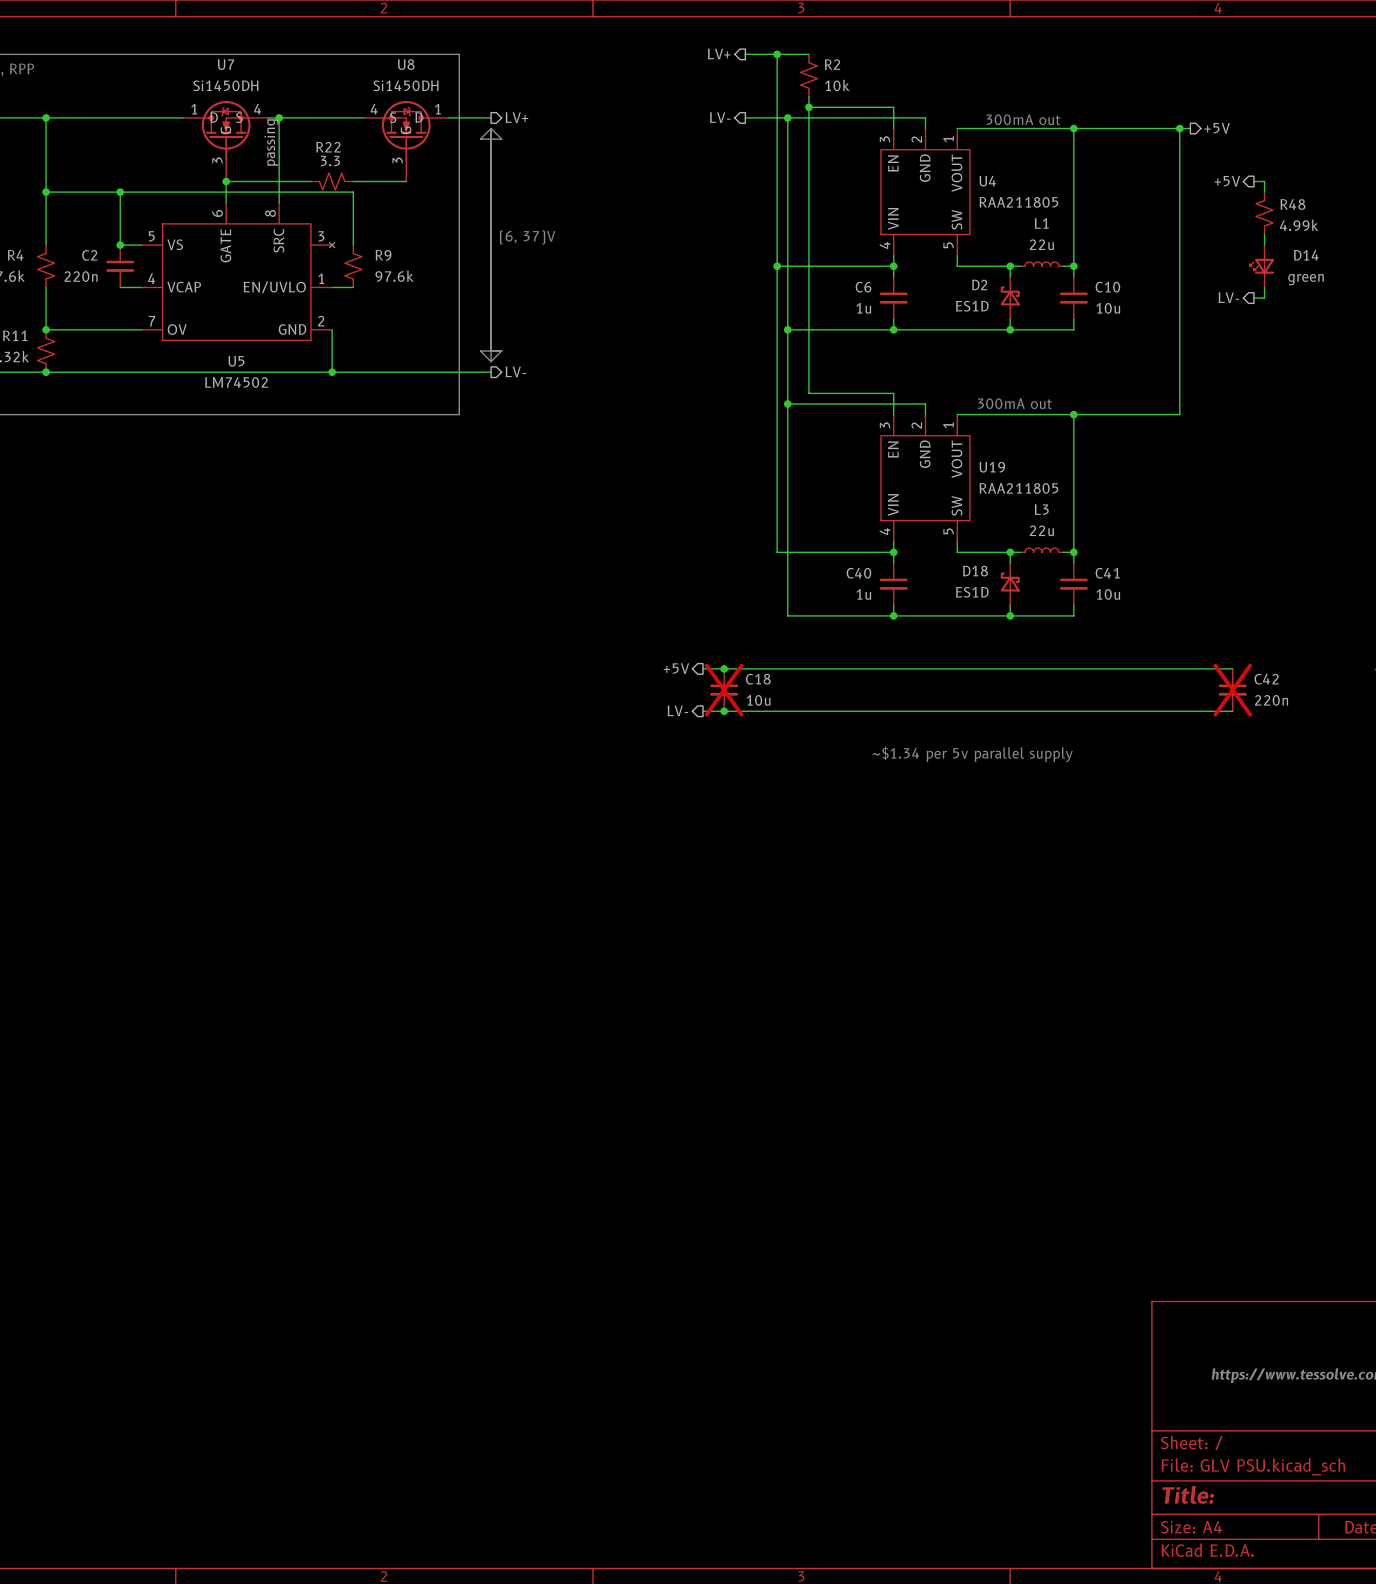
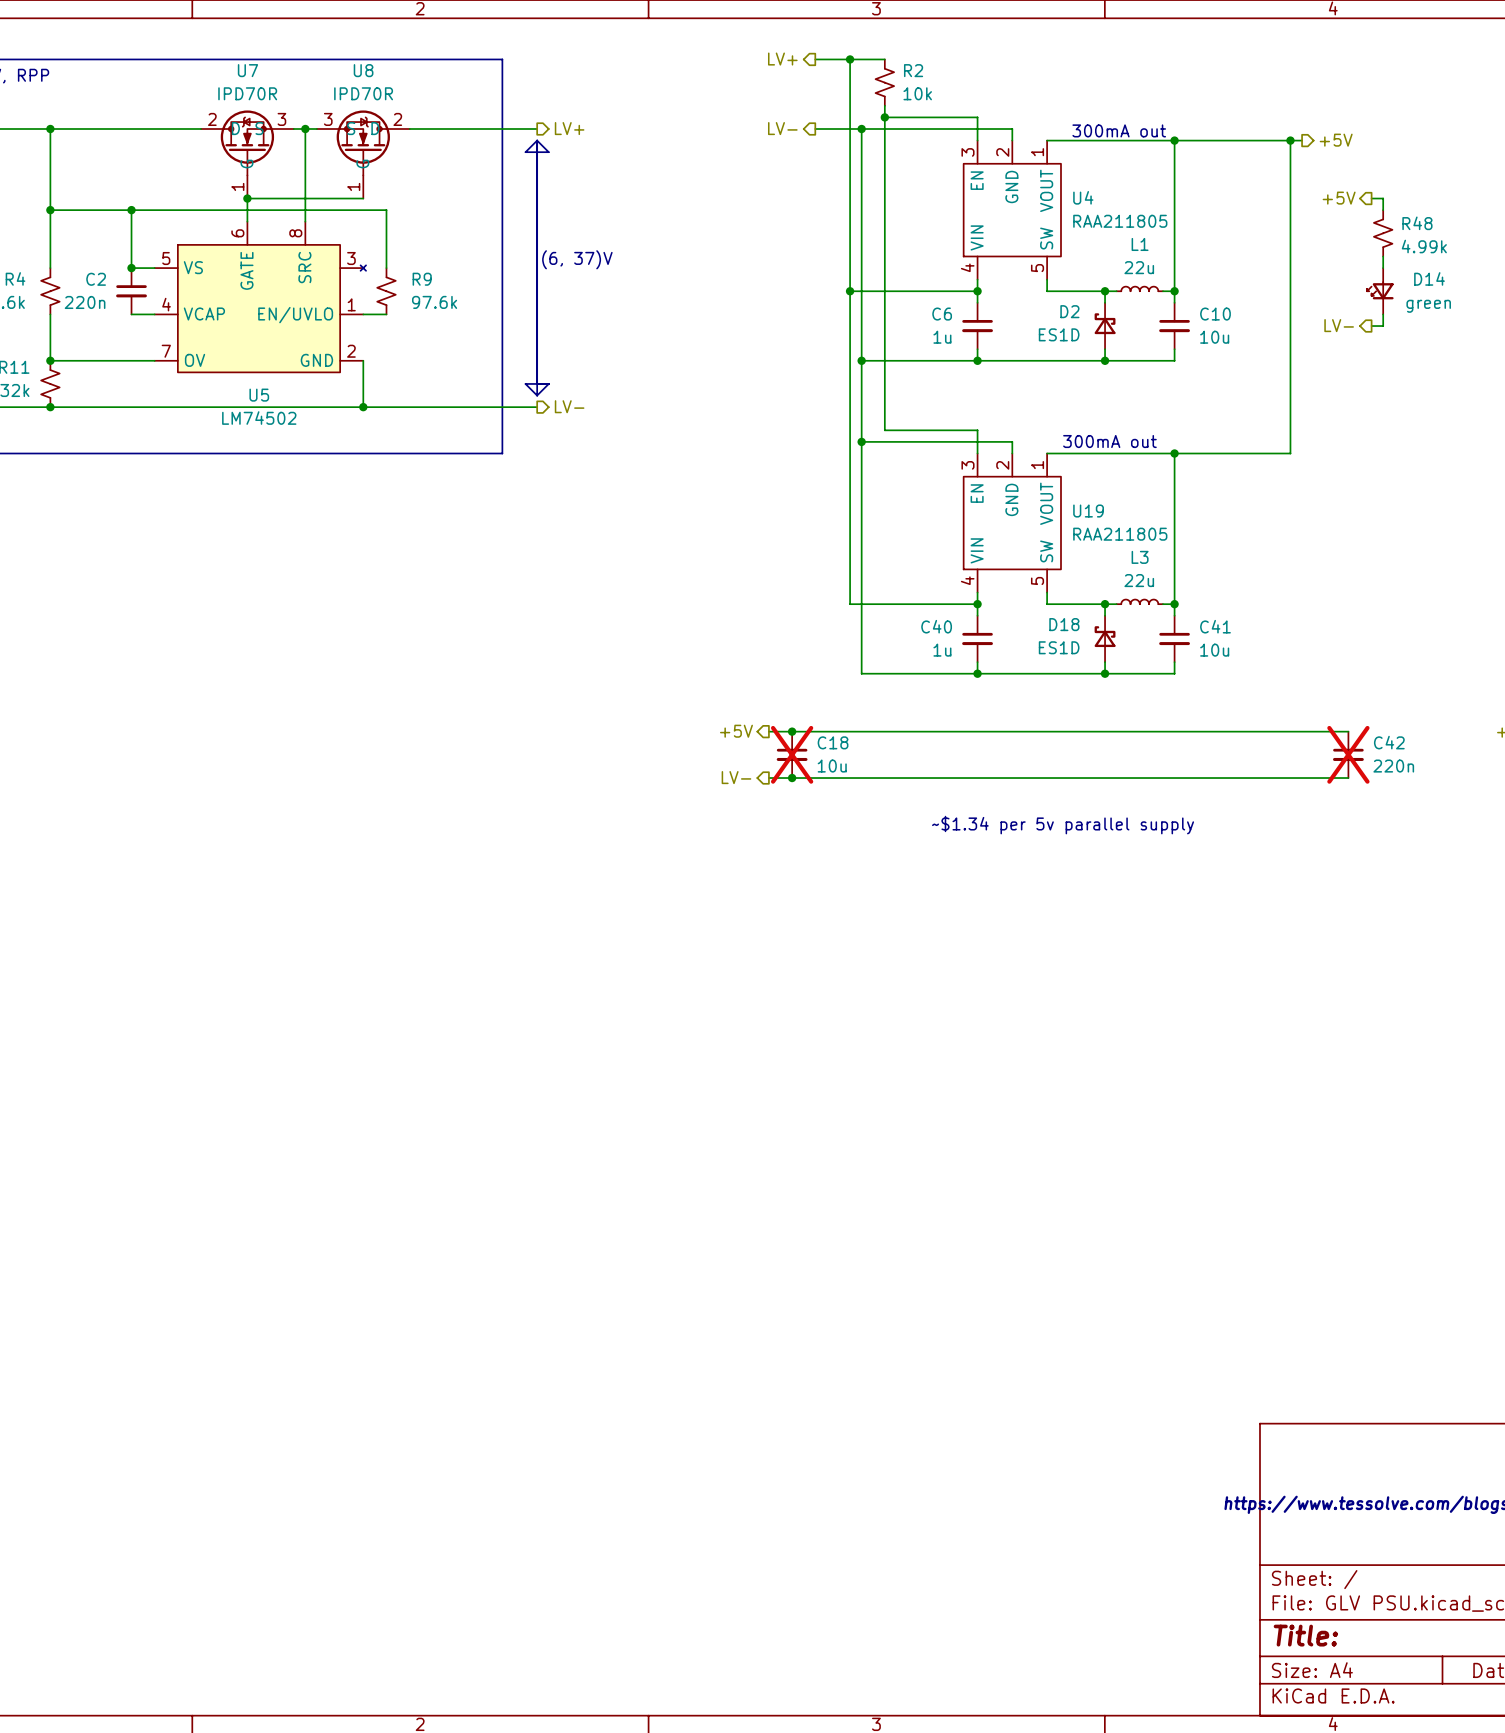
U7 value: Si1450DH (225, 85) -> IPD70R (247, 93)
U8 value: Si1450DH (405, 85) -> IPD70R (363, 93)
U7 symbol: [183, 100, 269, 182] -> [201, 110, 294, 199]
U8 symbol: [363, 100, 449, 182] -> [316, 110, 410, 199]
label: passing (271, 142) -> none
R22: 3.3 (332, 181) -> none
wire: (353, 181) (406, 181) -> none

